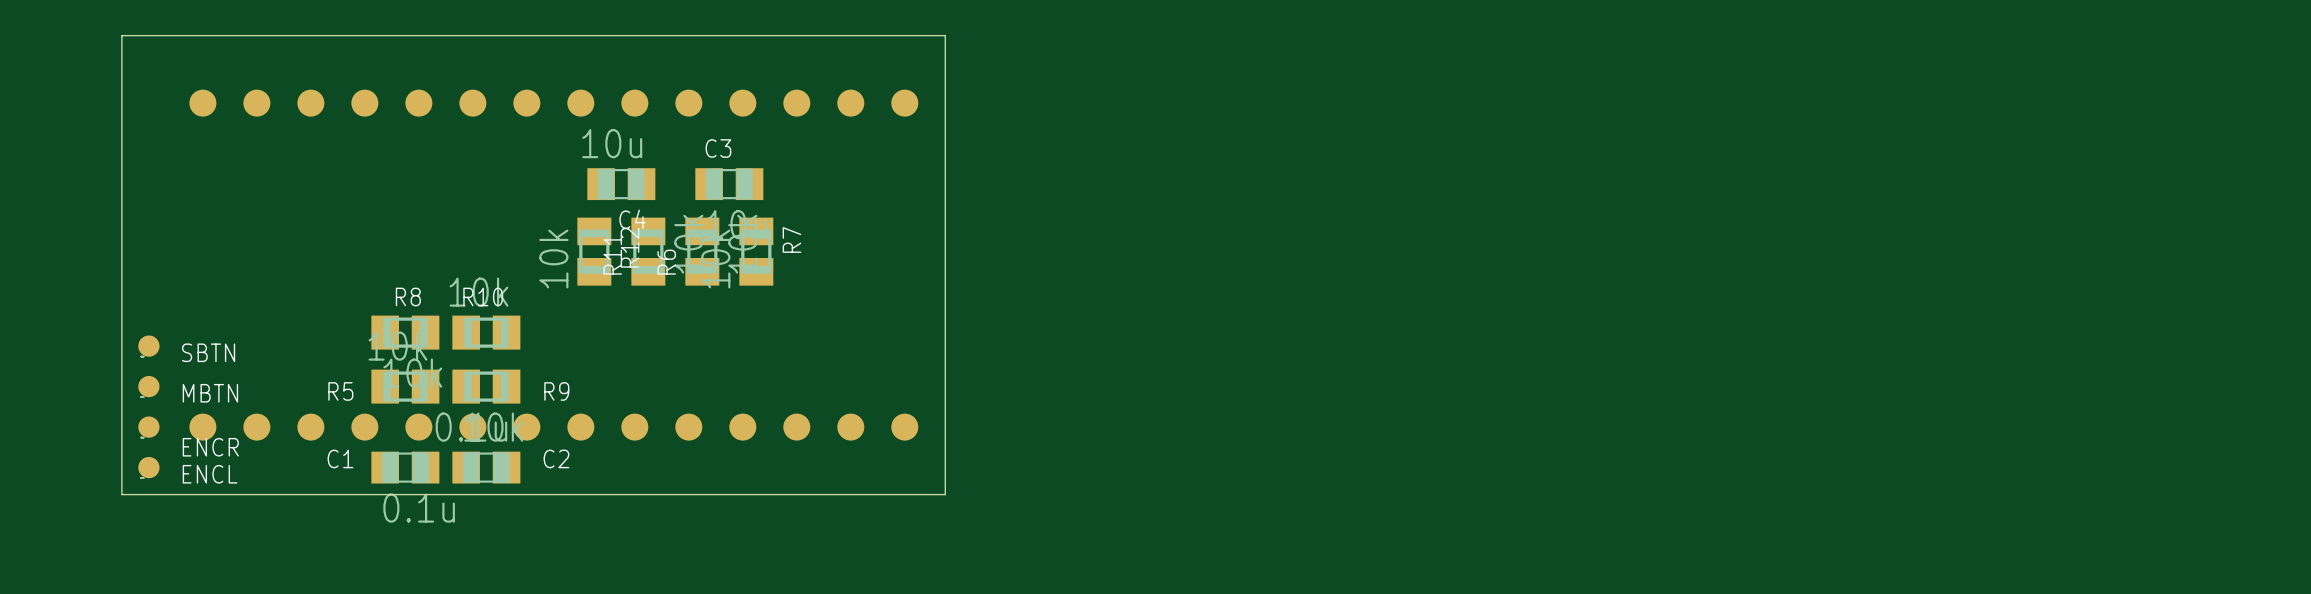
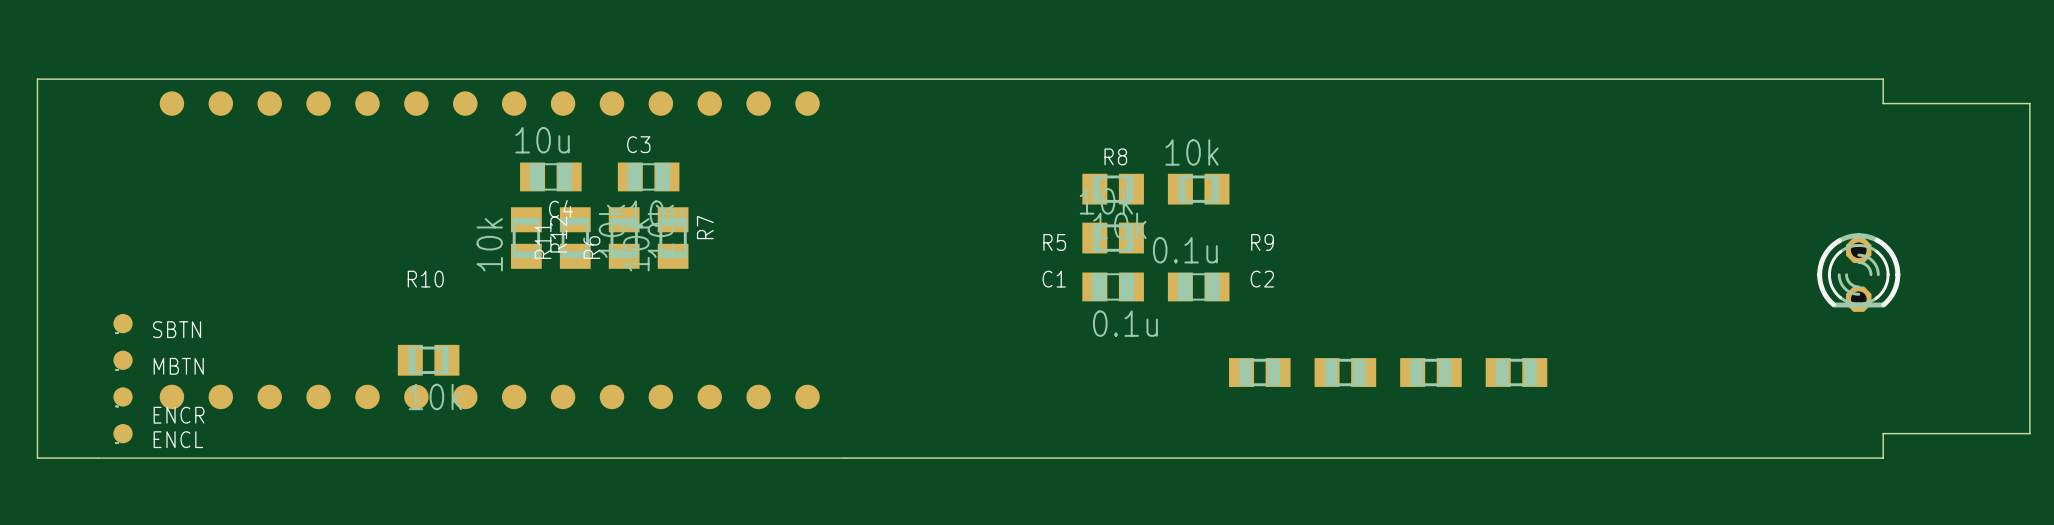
part: none -> (1858, 272)
R8 position: (405, 332) -> (1113, 189)
R9 position: (486, 332) -> (1198, 189)
R5 position: (405, 386) -> (1113, 238)
part: none -> (1259, 372)
part: none -> (1345, 372)
part: none -> (1430, 372)
part: none -> (1516, 372)
C1 position: (405, 467) -> (1113, 286)
C2 position: (486, 467) -> (1198, 286)
board edge: (945, 494) (945, 35) (121, 35) (121, 494) -> (844, 458) (1883, 458) (1883, 433) (2029, 433) (2029, 103) (1883, 103) (1883, 79) (37, 79) (37, 458) (98, 458)

